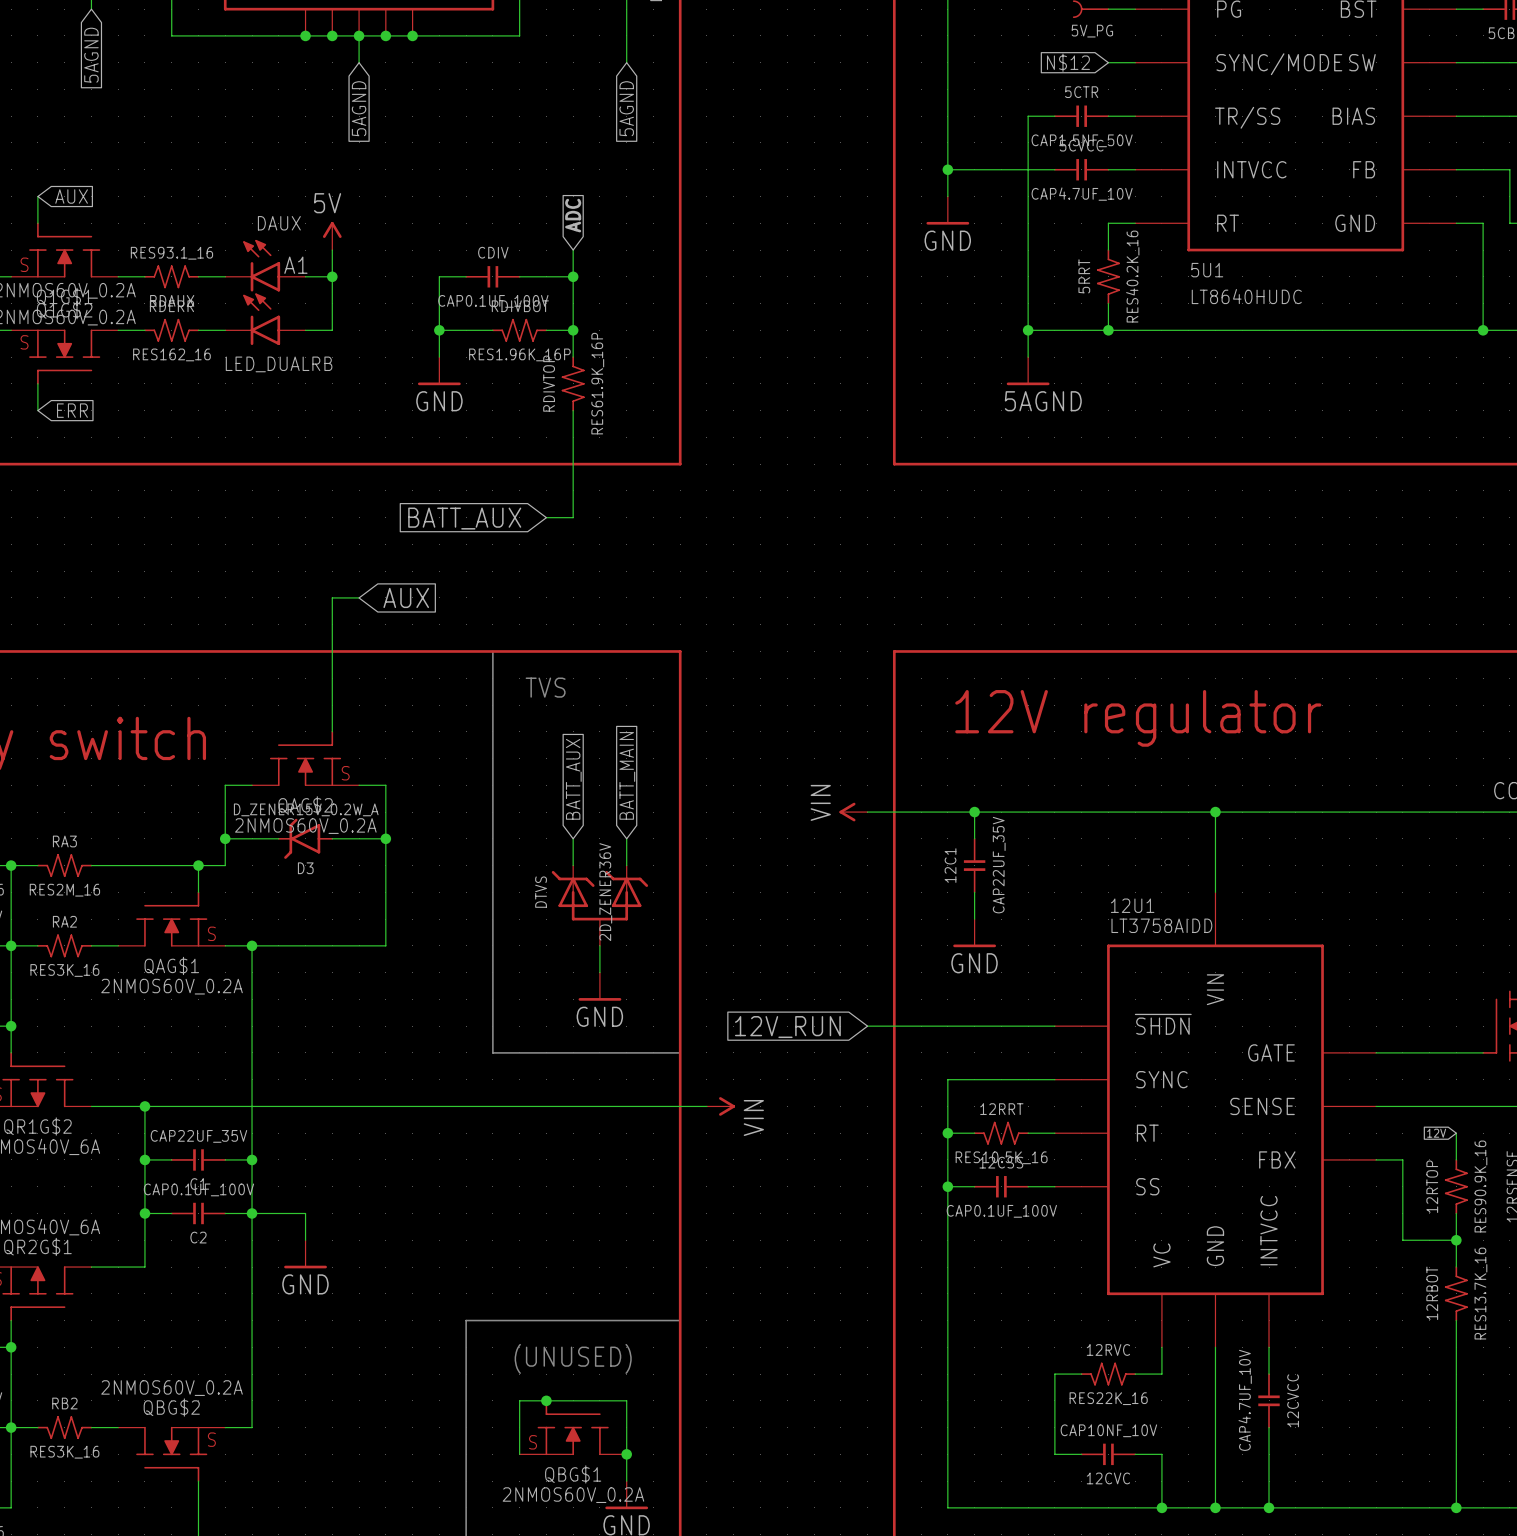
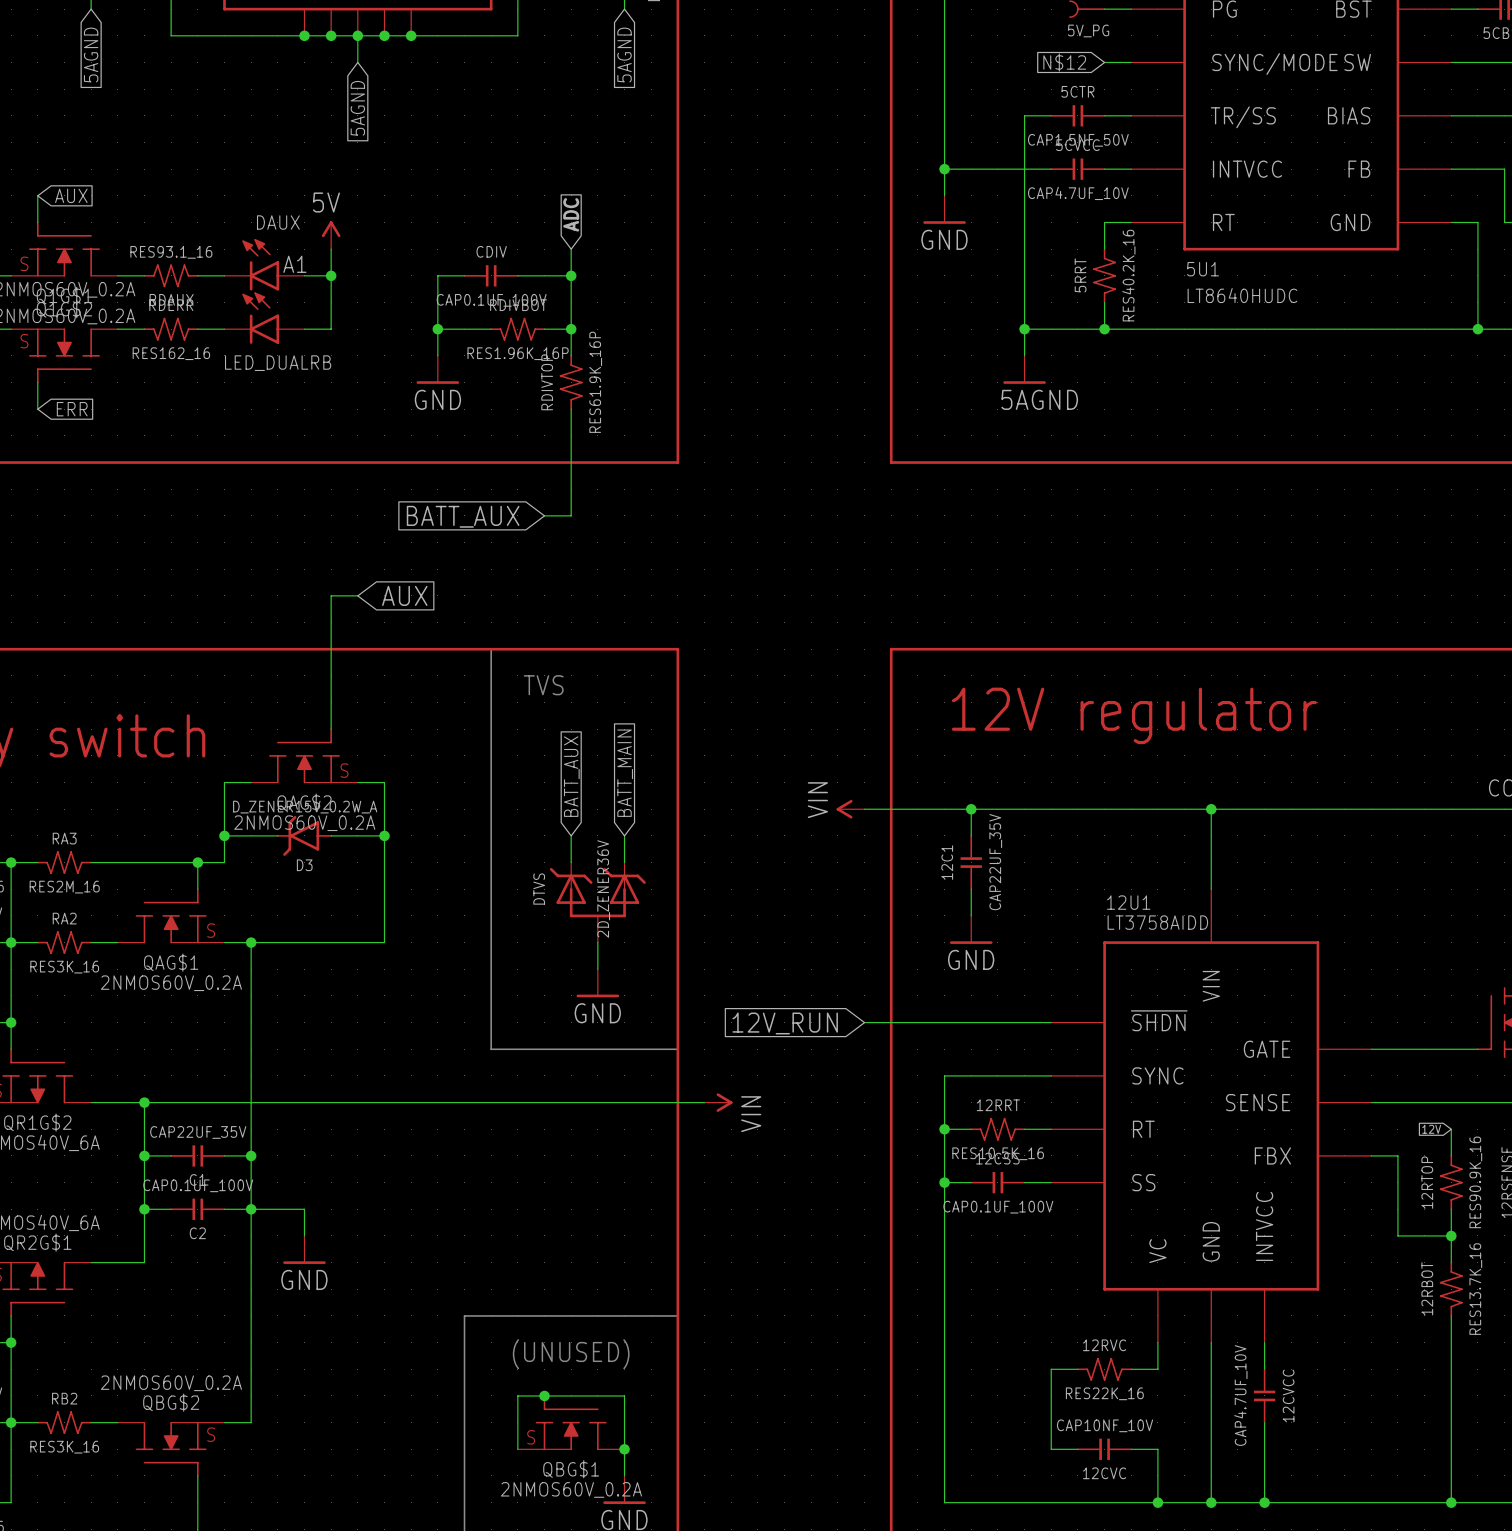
wire: (626, 9) (626, 62) -> none
global label position: 5AGND (626, 108) -> 5AGND (624, 54)

